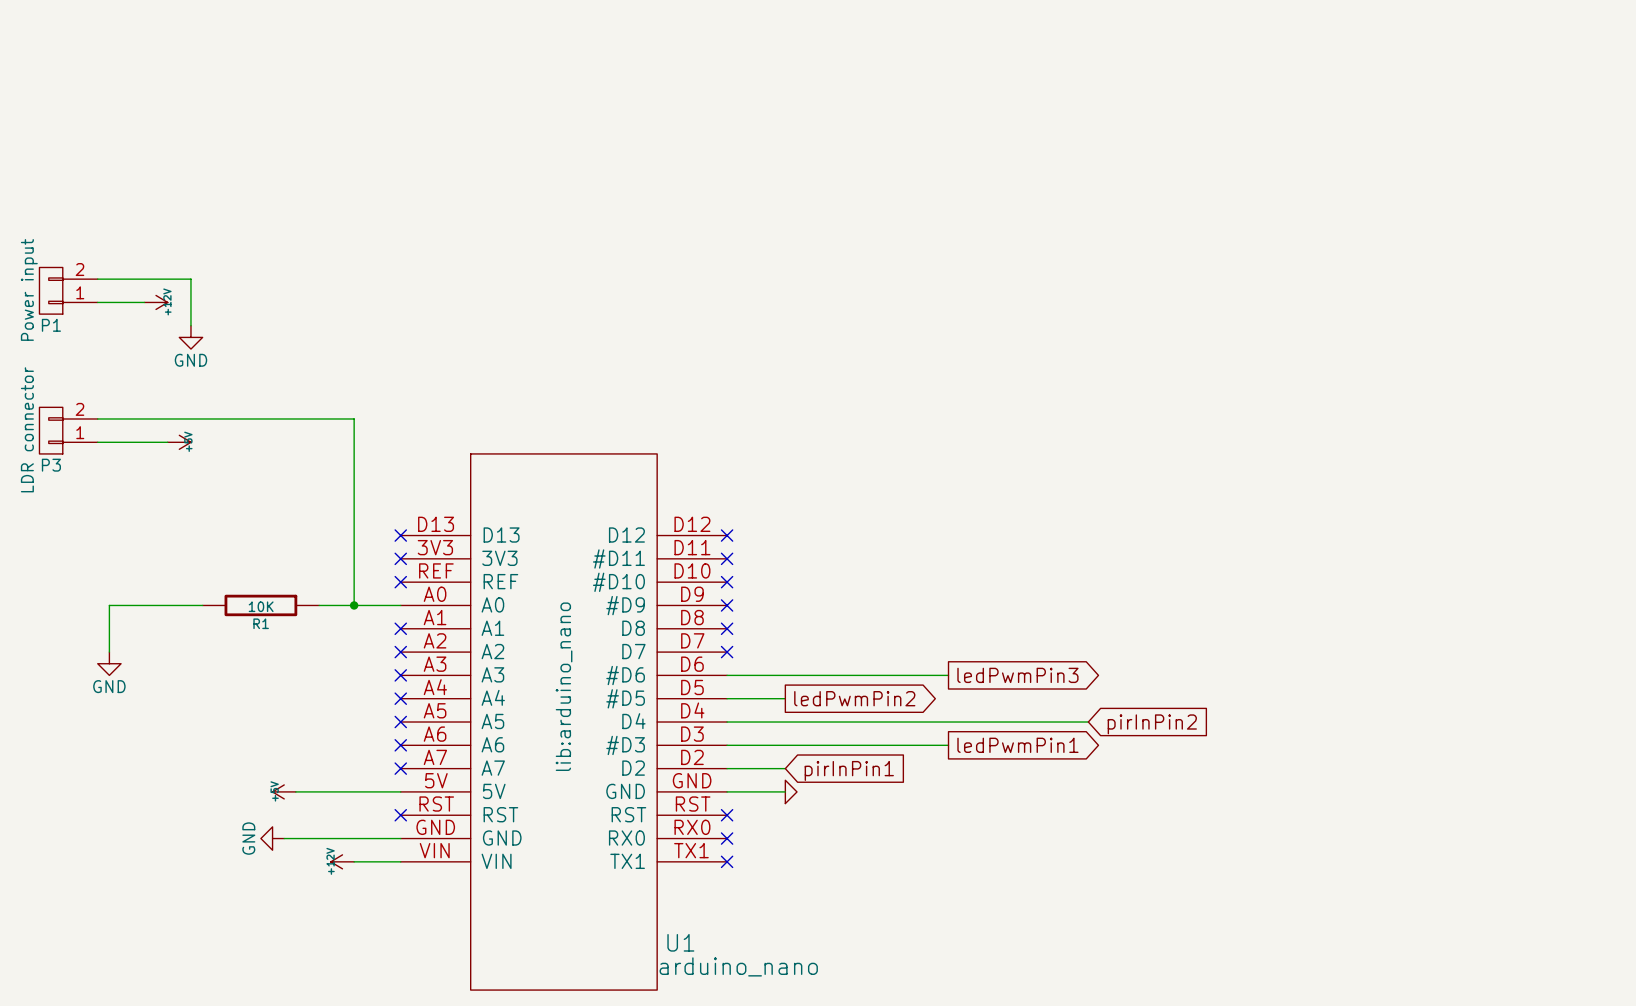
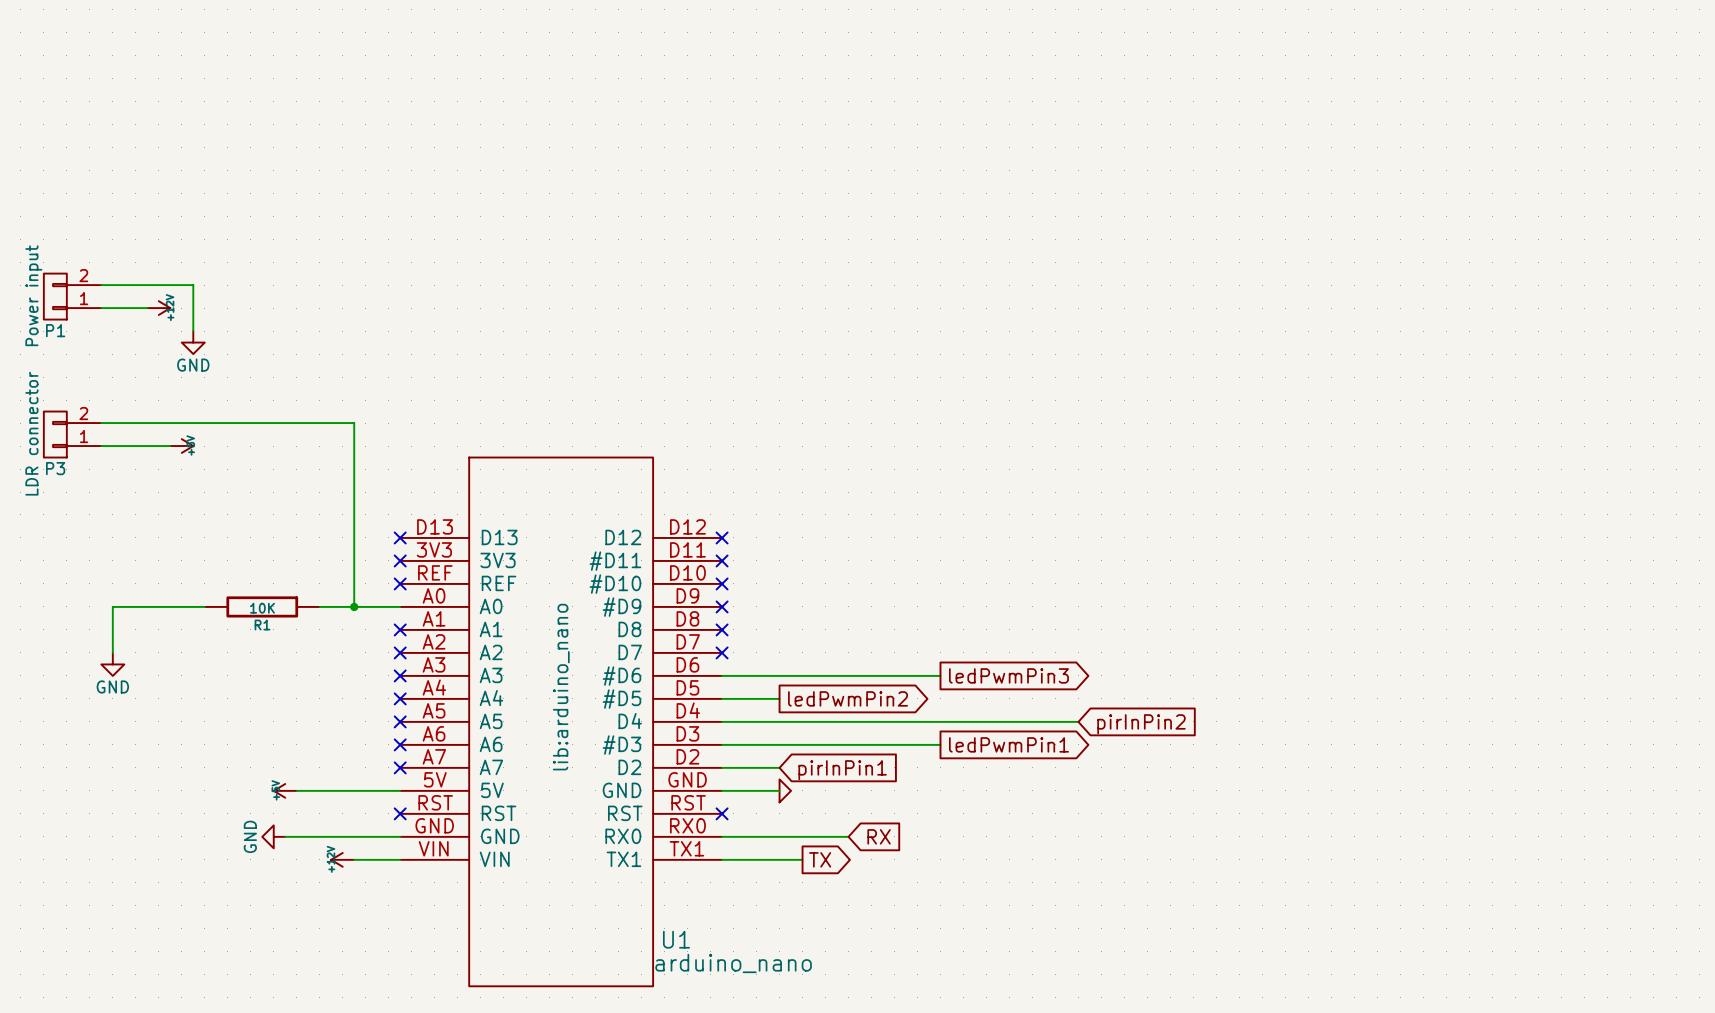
wire: none -> (722, 836) (848, 836)
no-connect mark: (727, 838) -> none
global label: none -> RX (879, 836)
wire: none -> (722, 859) (802, 859)
no-connect mark: (727, 861) -> none
global label: none -> TX (820, 859)

